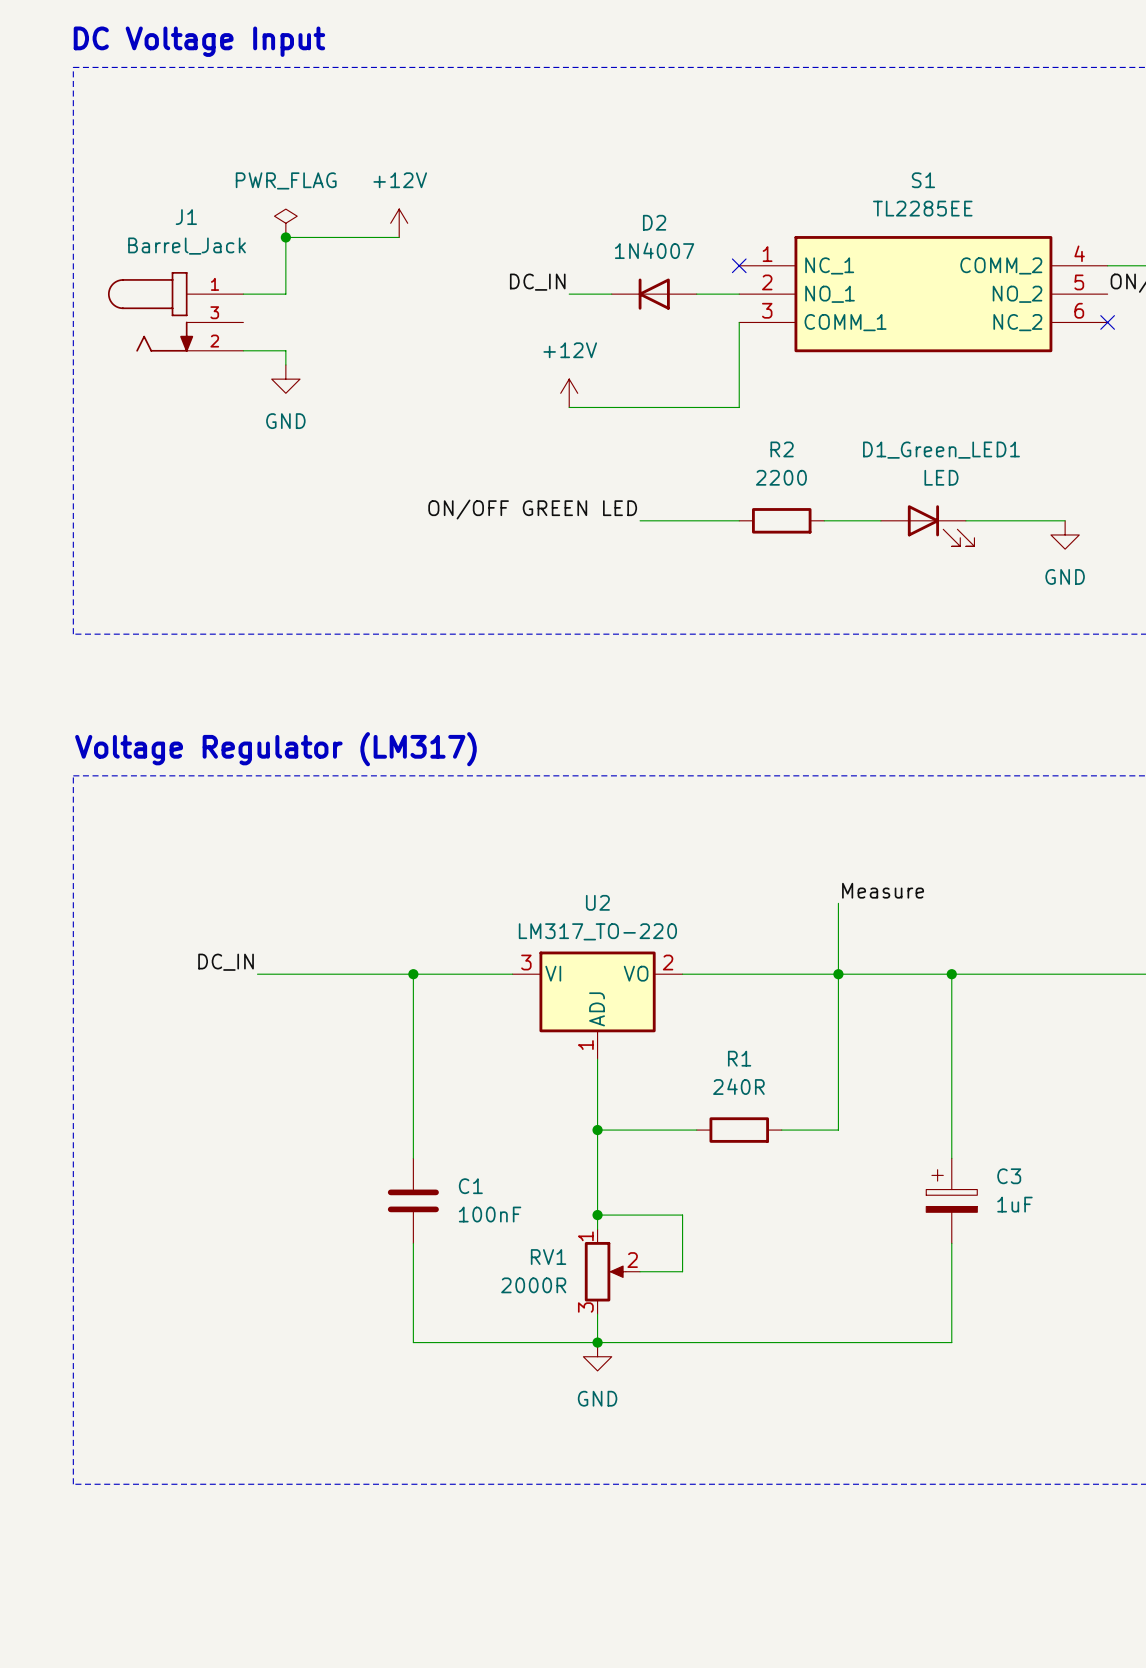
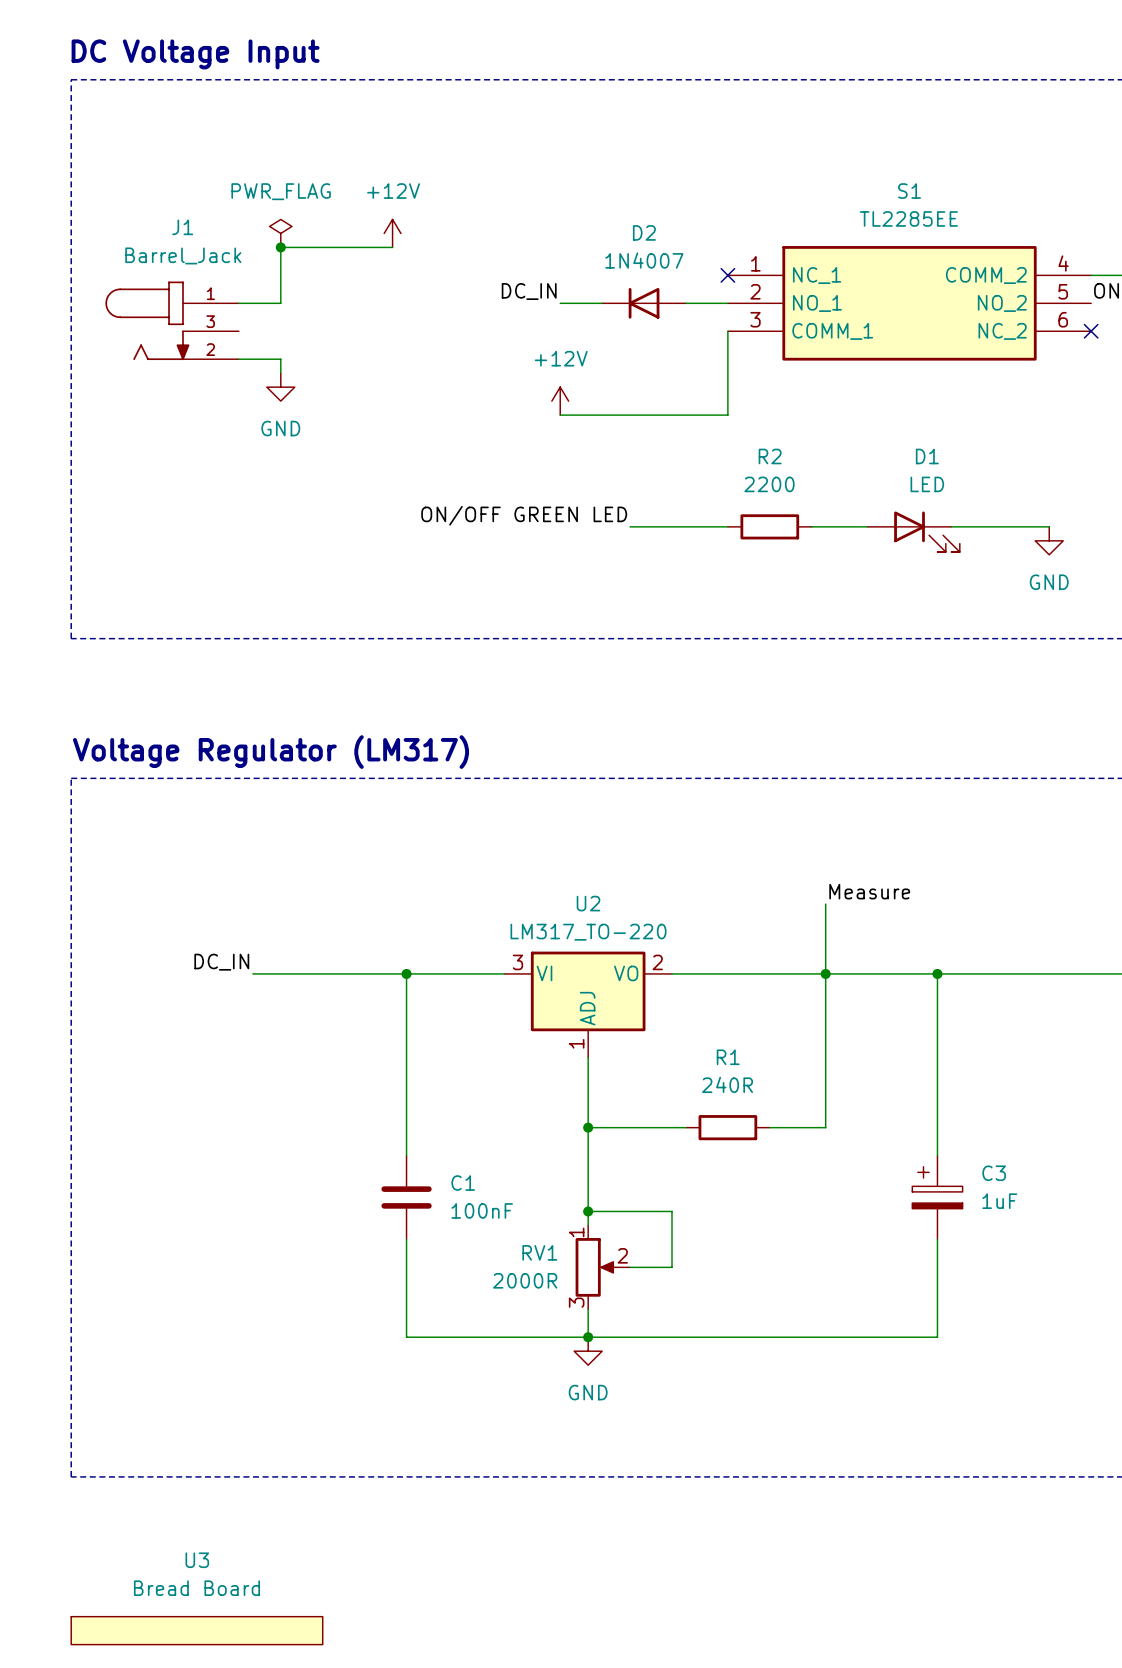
D1_Green_LED1 name: D1_Green_LED1 (941, 450) -> D1 (927, 456)
U3: none -> Bread Board (196, 1630)

